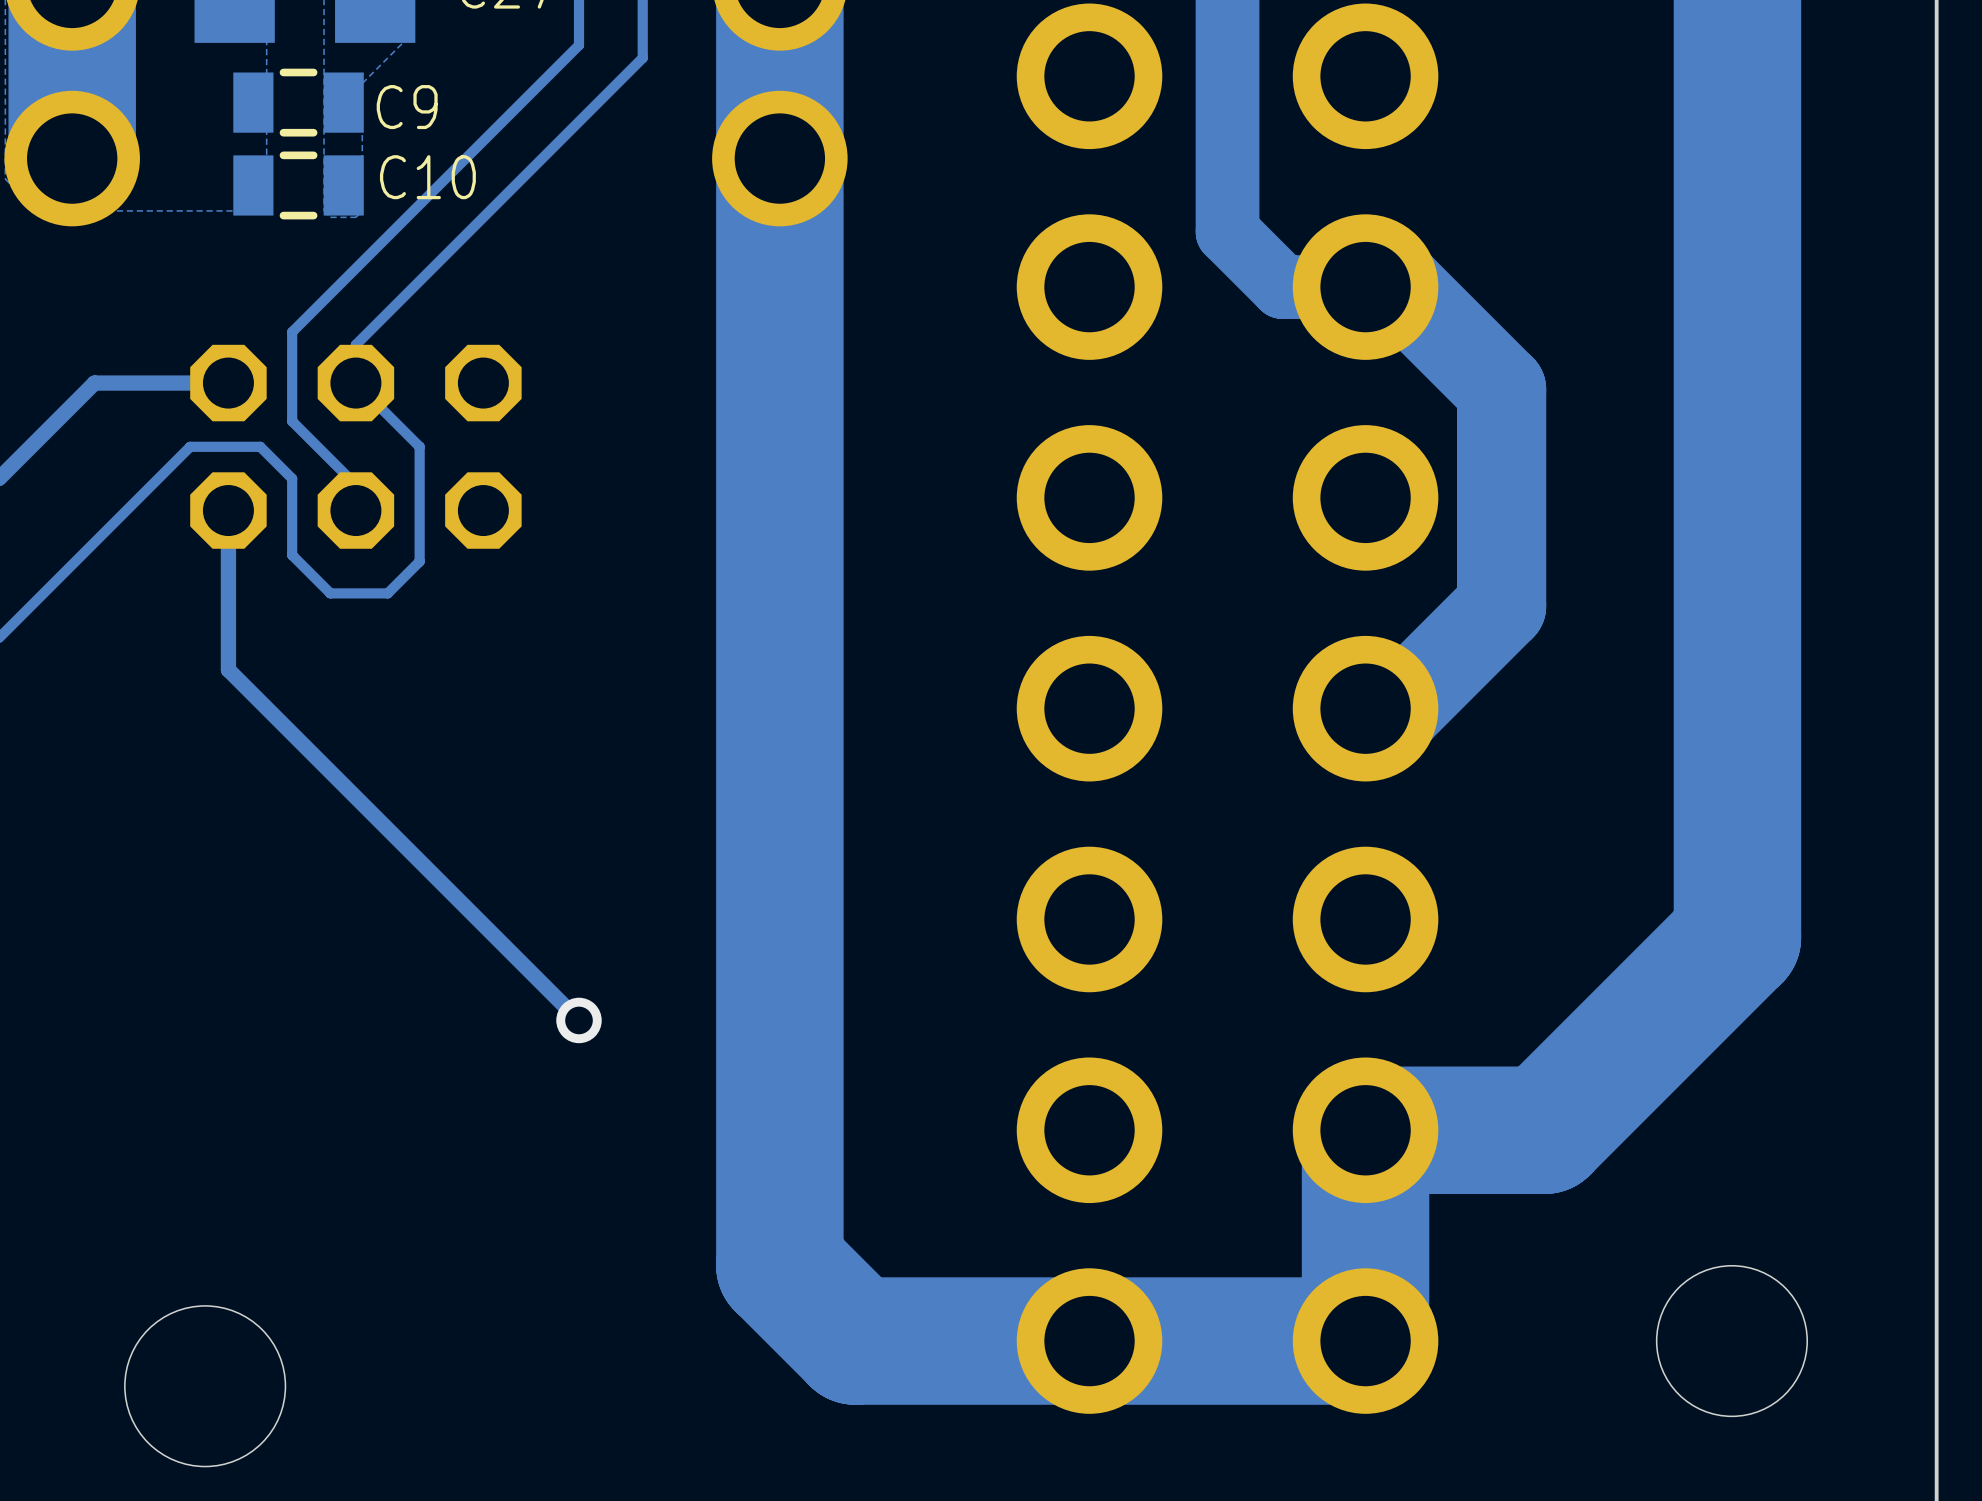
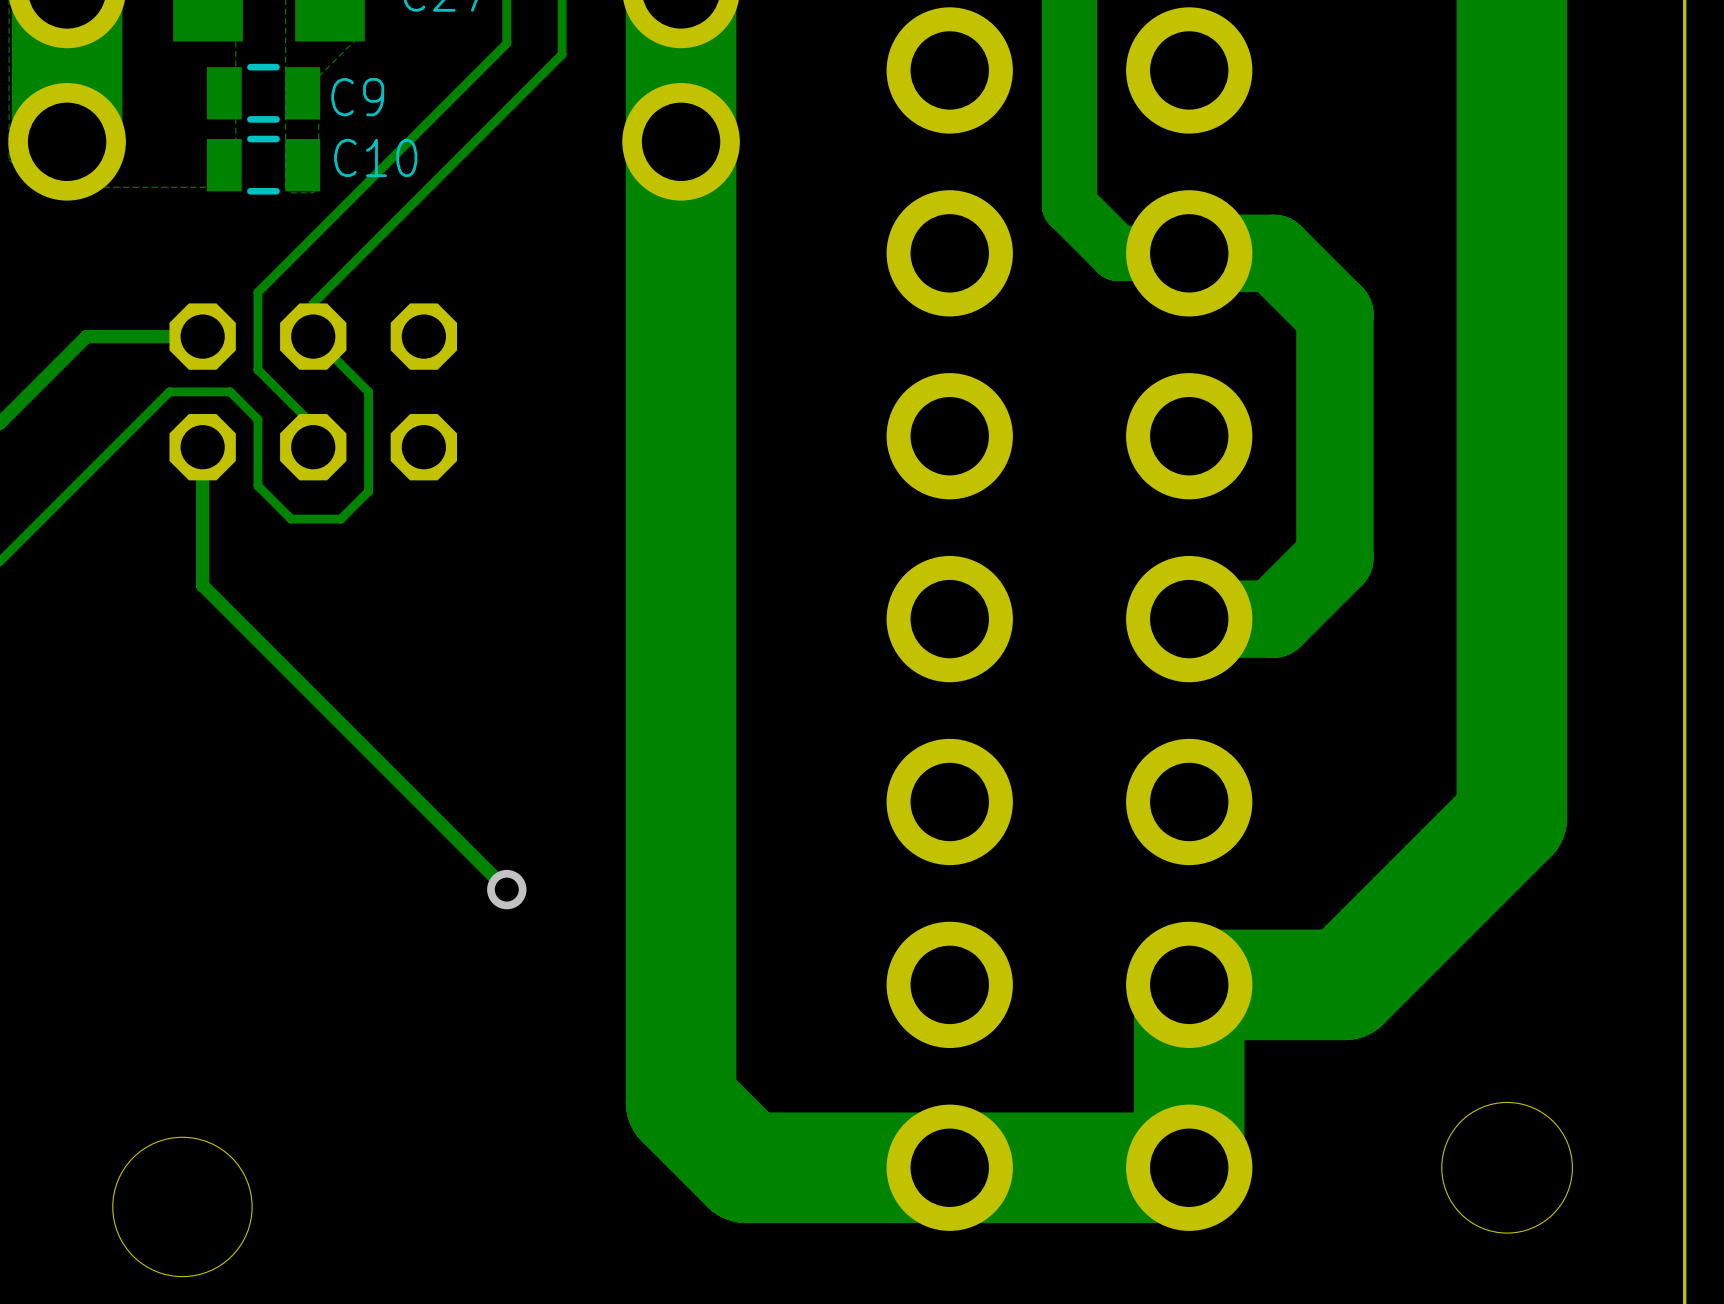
track: (1399, 287) (1501, 389) (1501, 606) (1399, 708) -> (1218, 253) (1273, 253) (1334, 314) (1334, 557) (1273, 619) (1218, 619)

